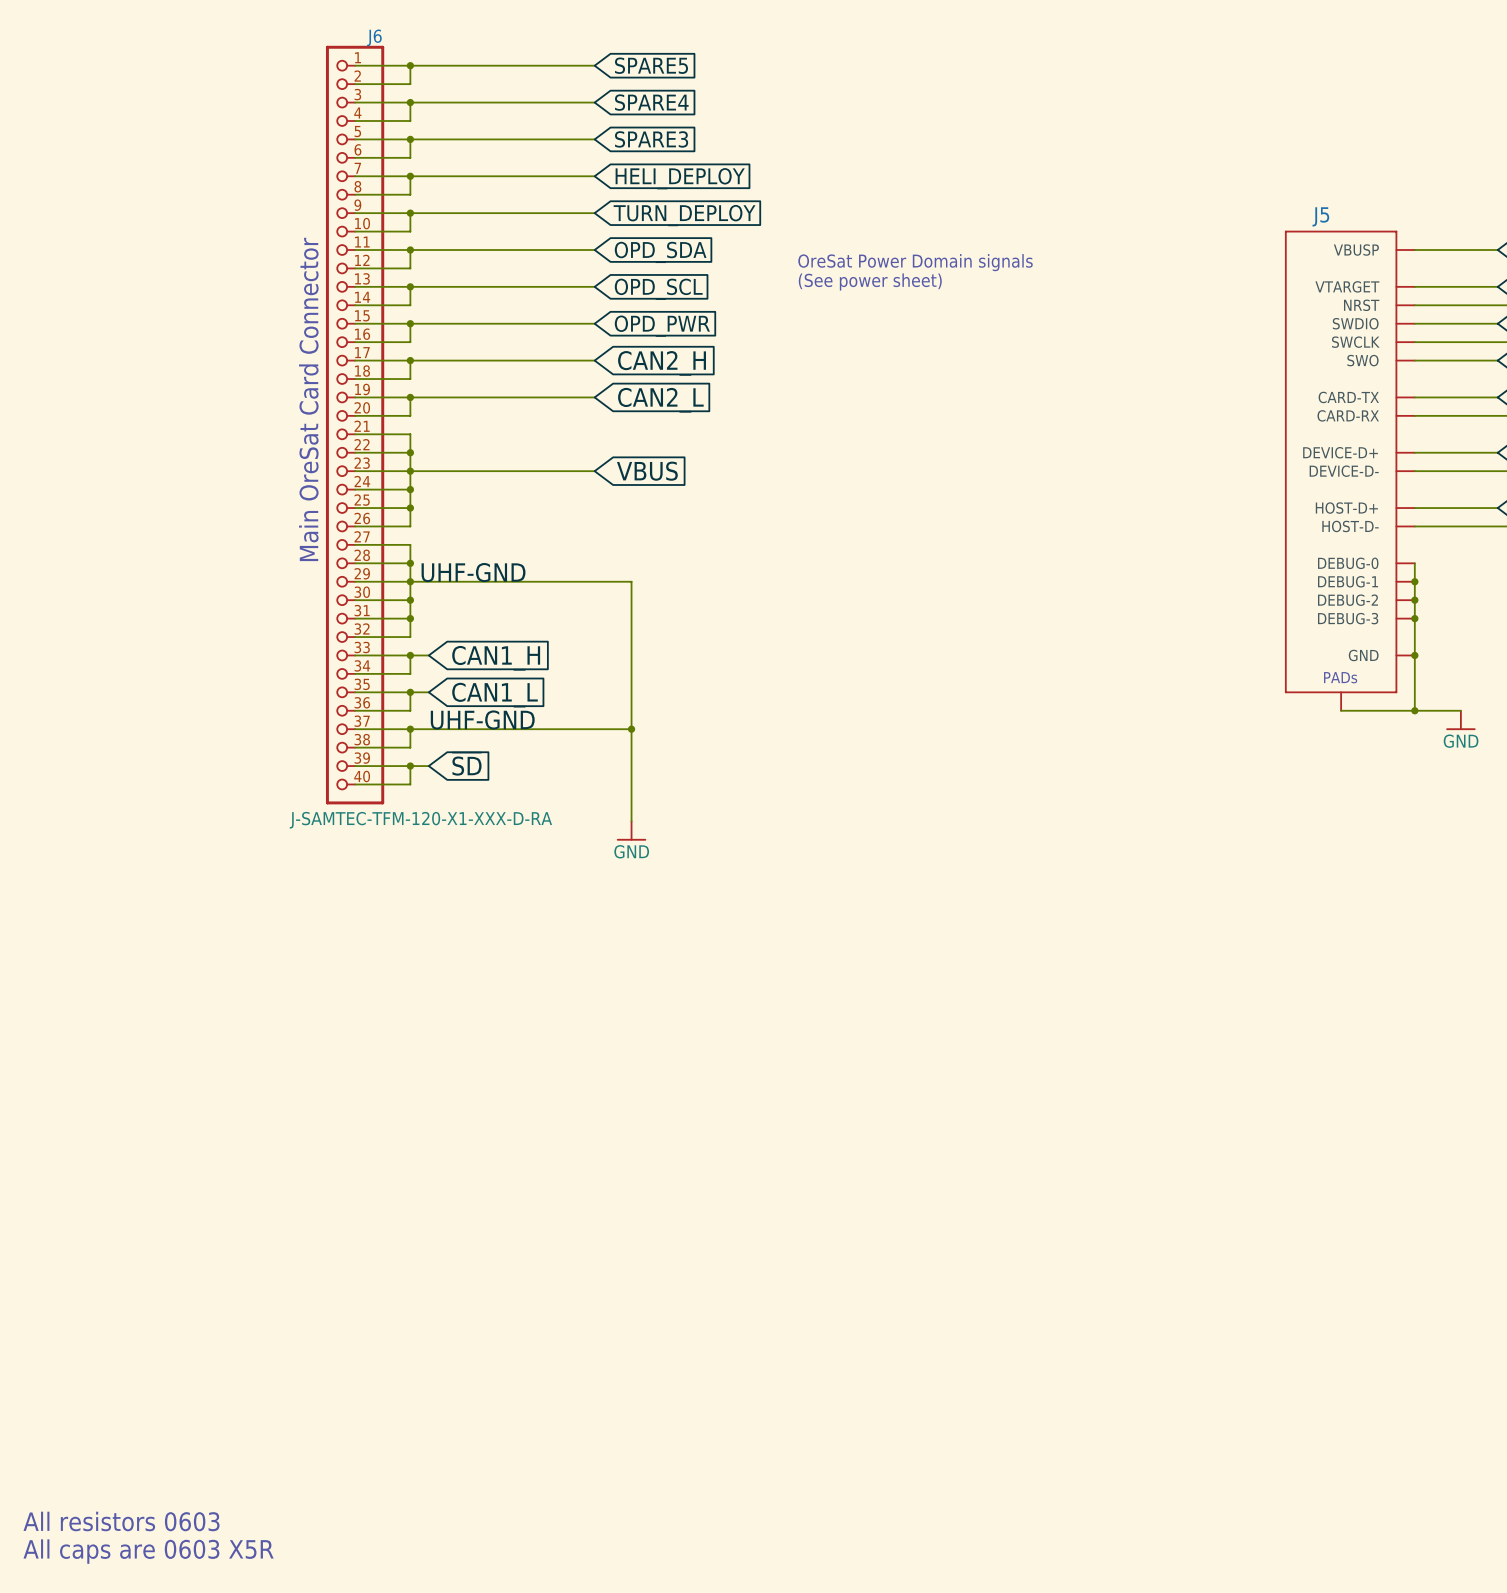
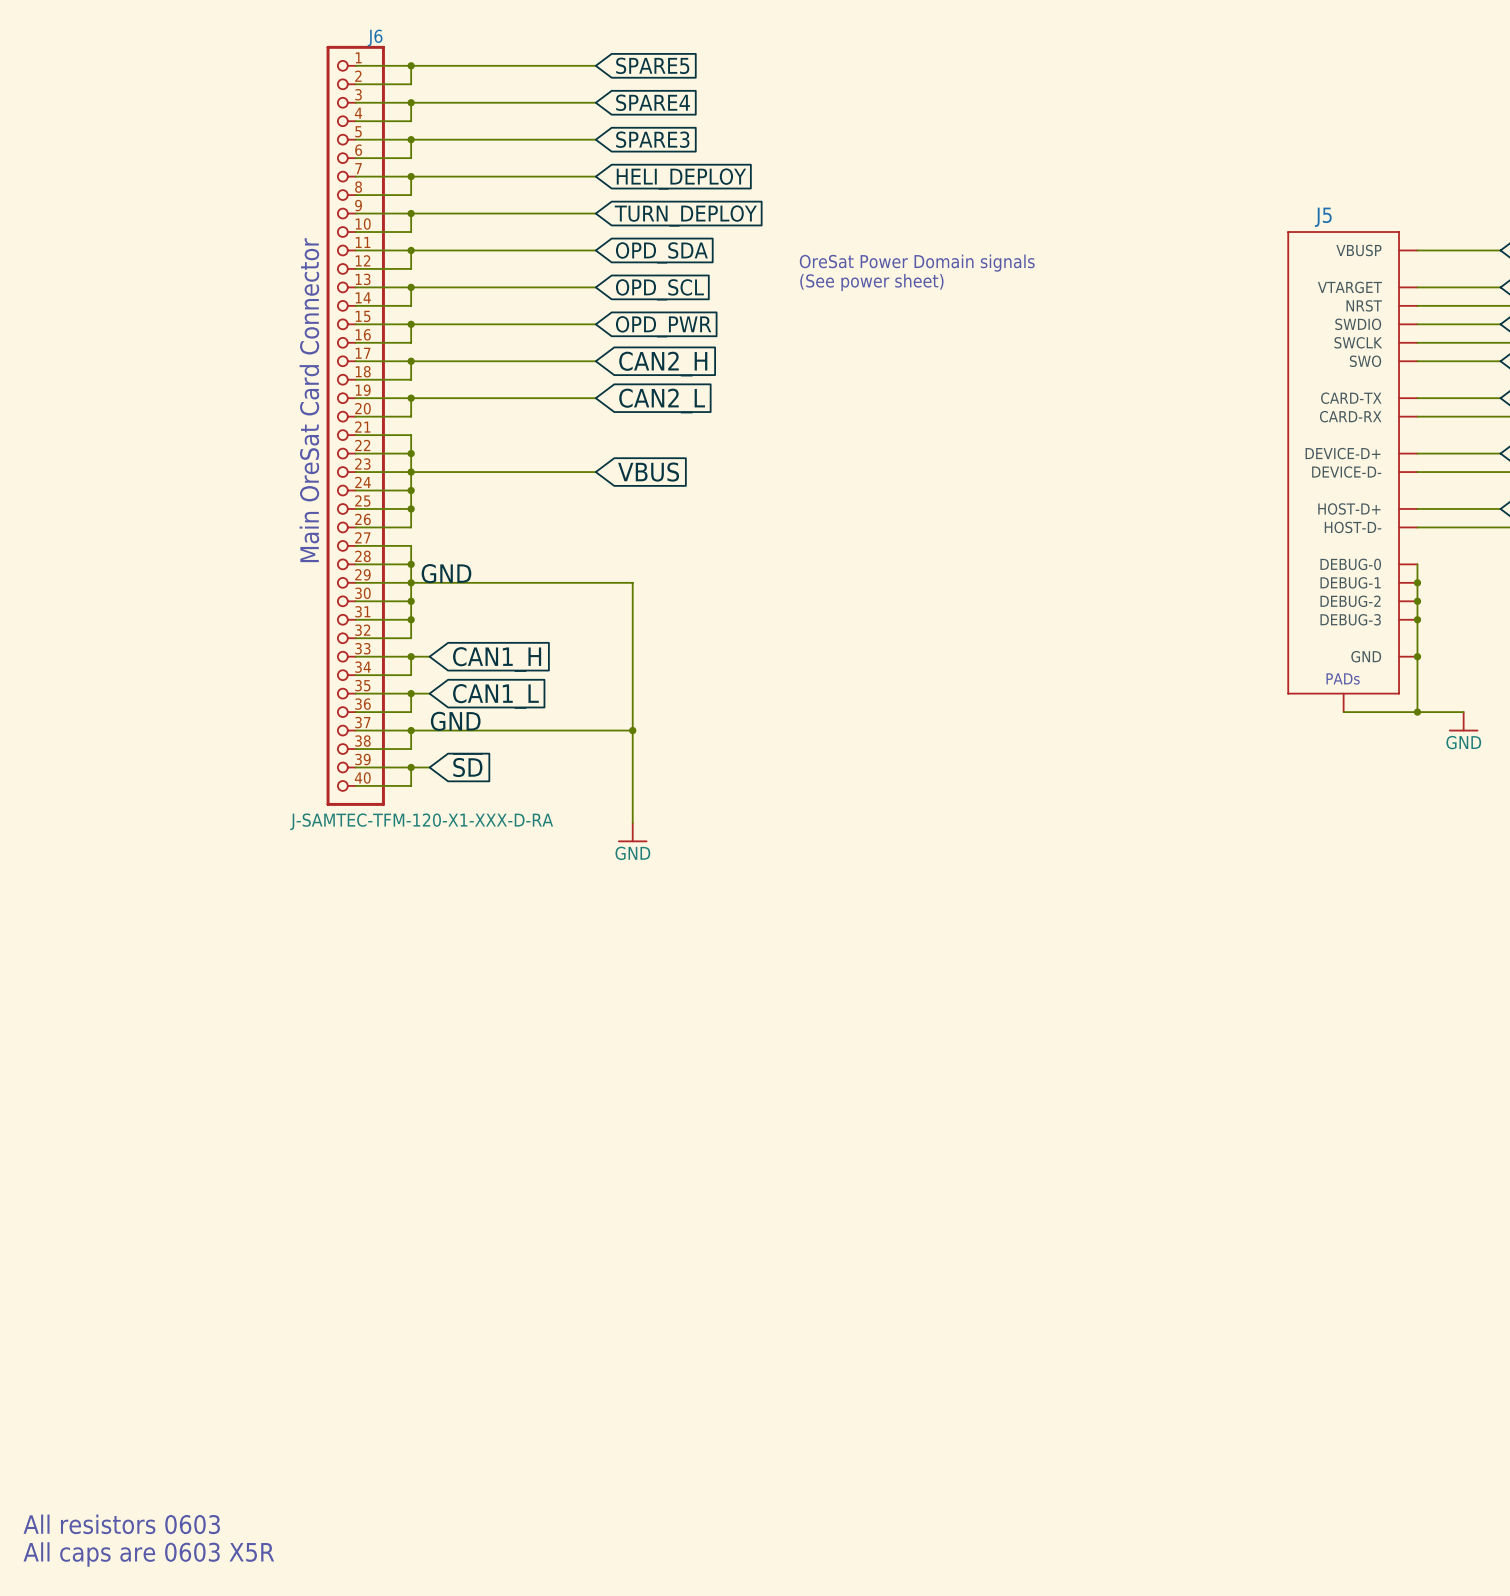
label: UHF-GND (473, 572) -> GND (446, 573)
label: UHF-GND (482, 719) -> GND (455, 721)

